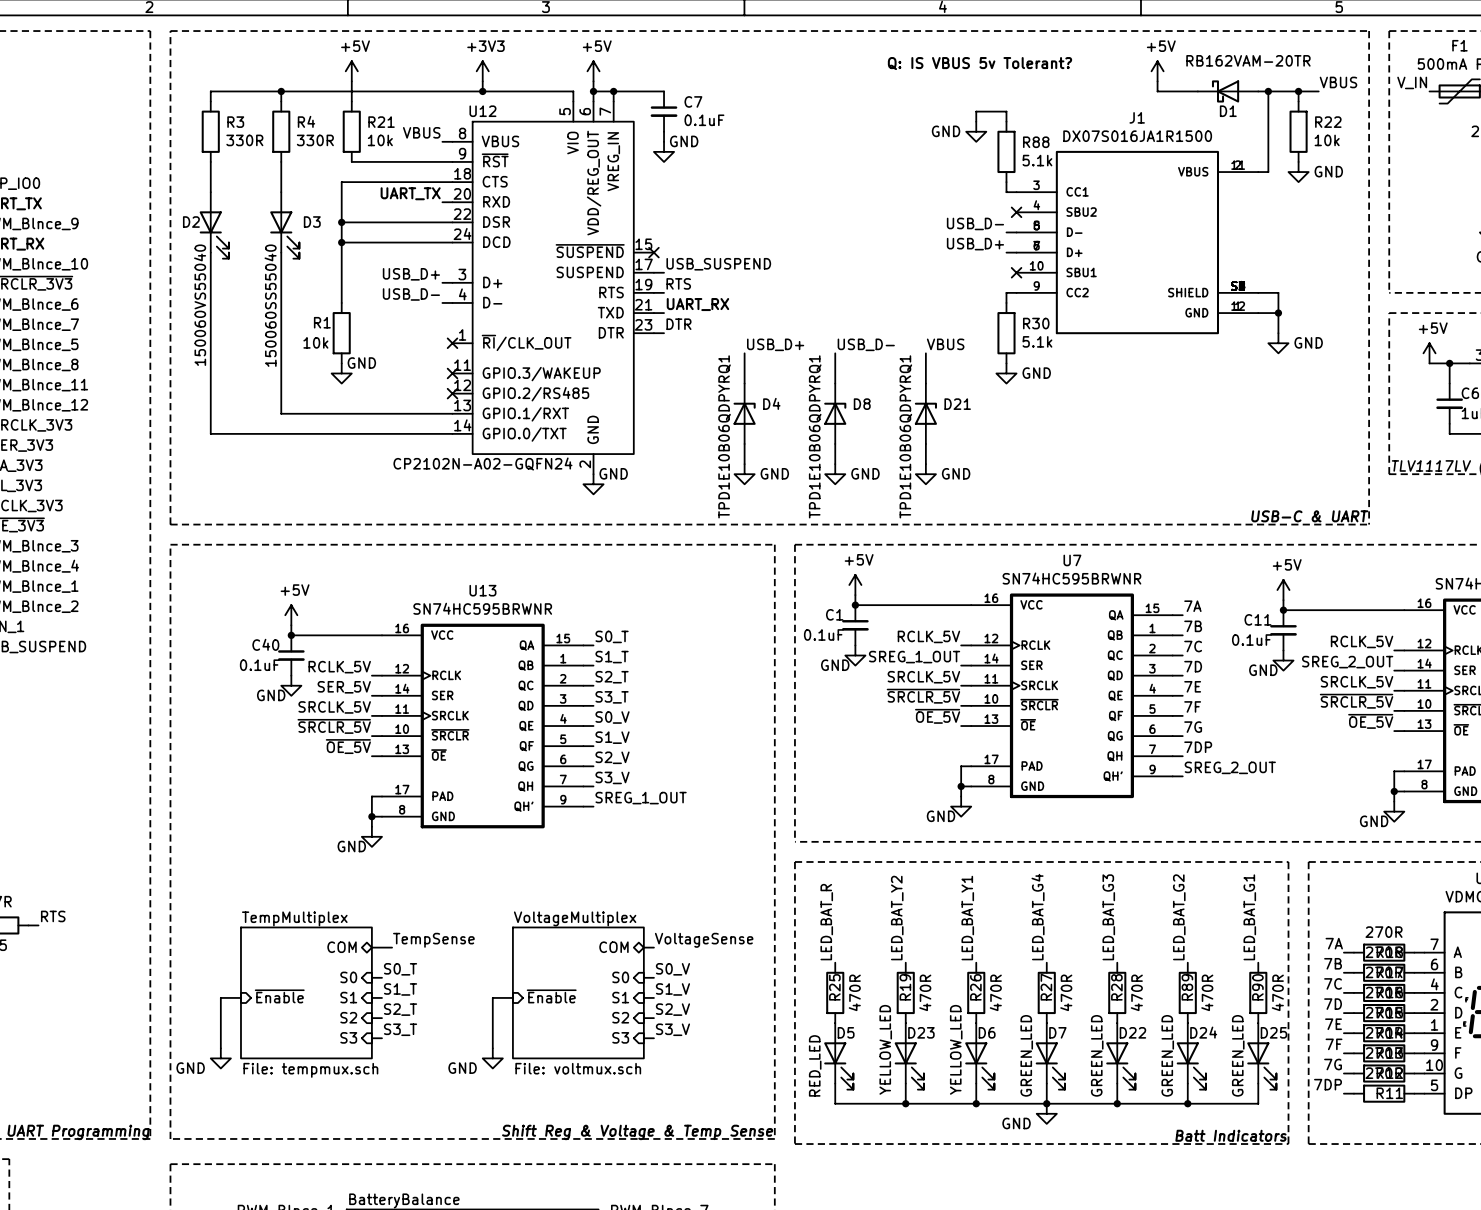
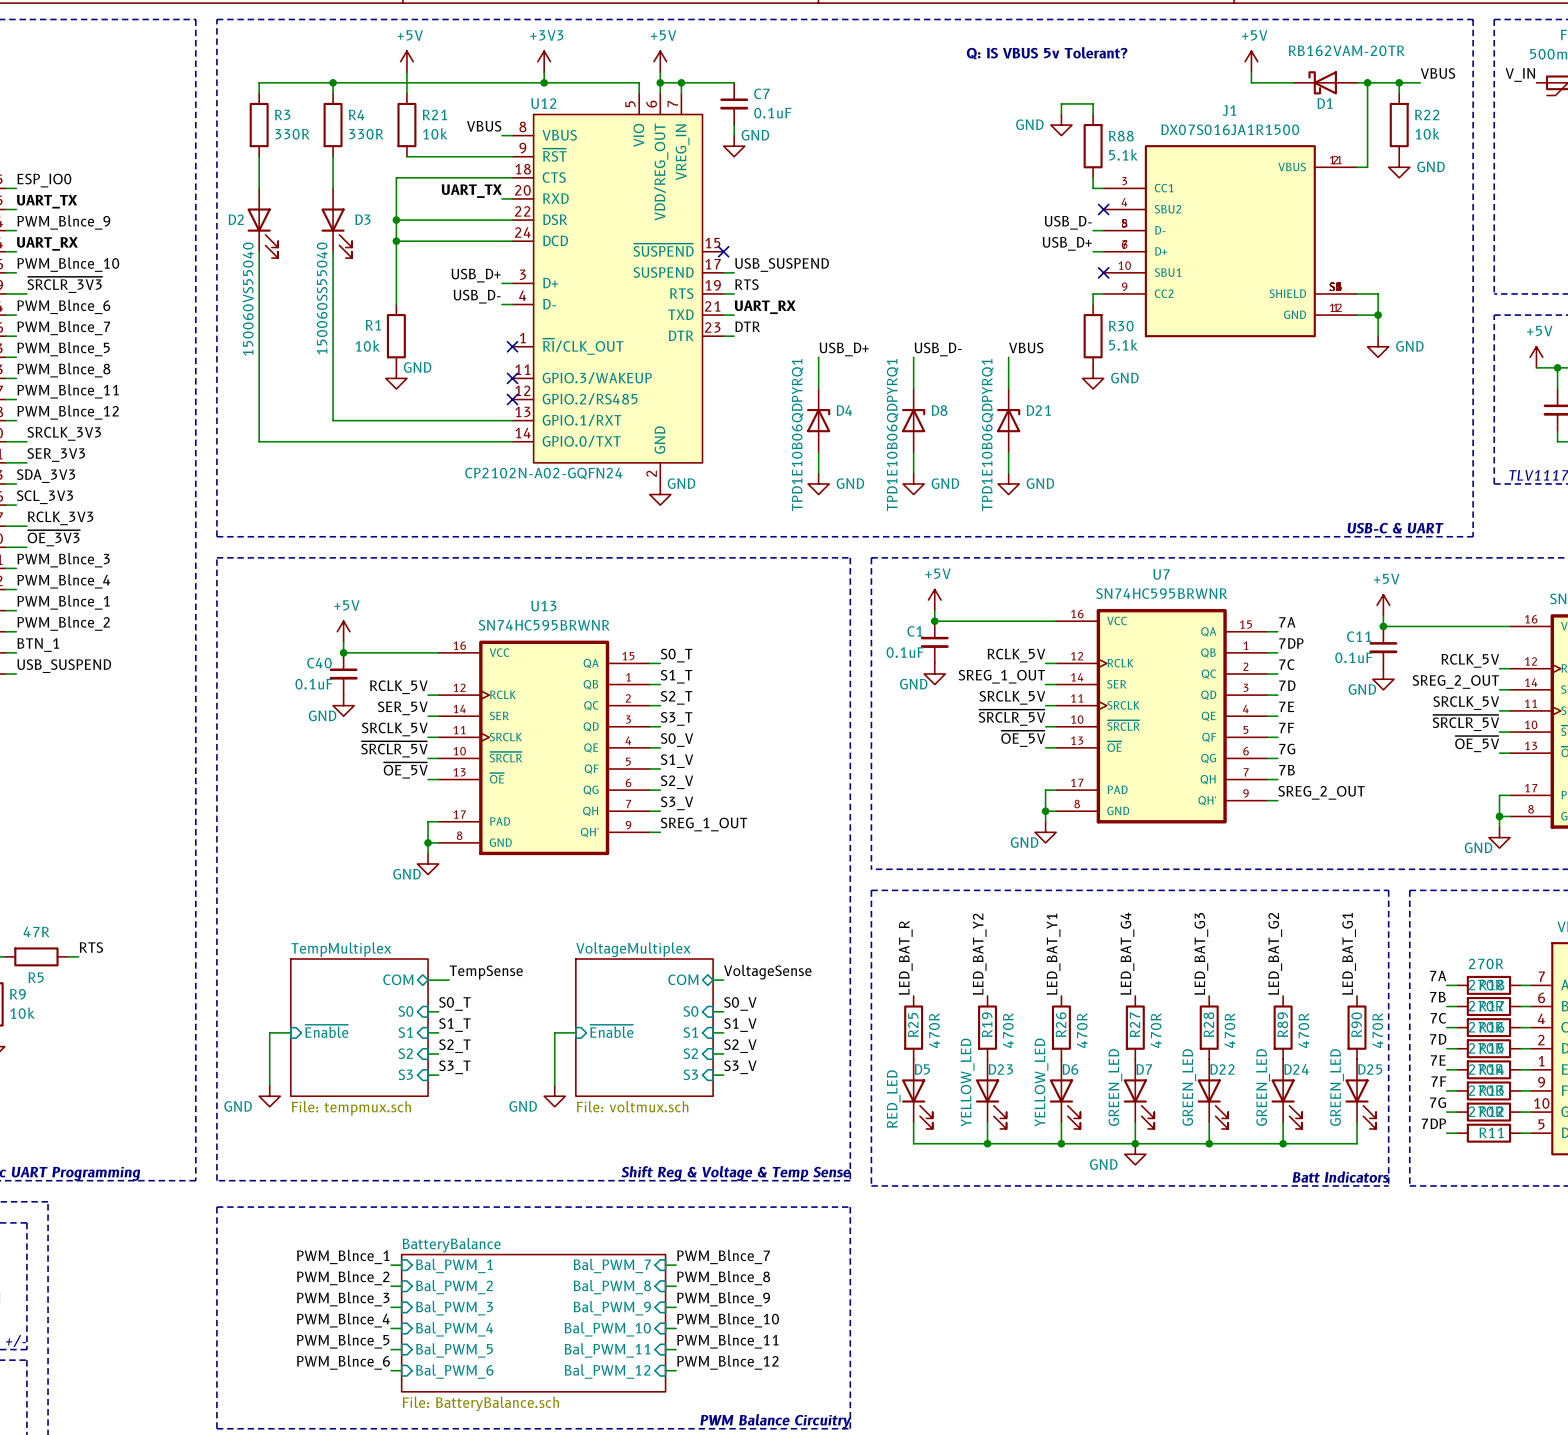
label: 7B (1193, 626) -> 7DP (1291, 643)
label: 7DP (1198, 747) -> 7B (1287, 770)

